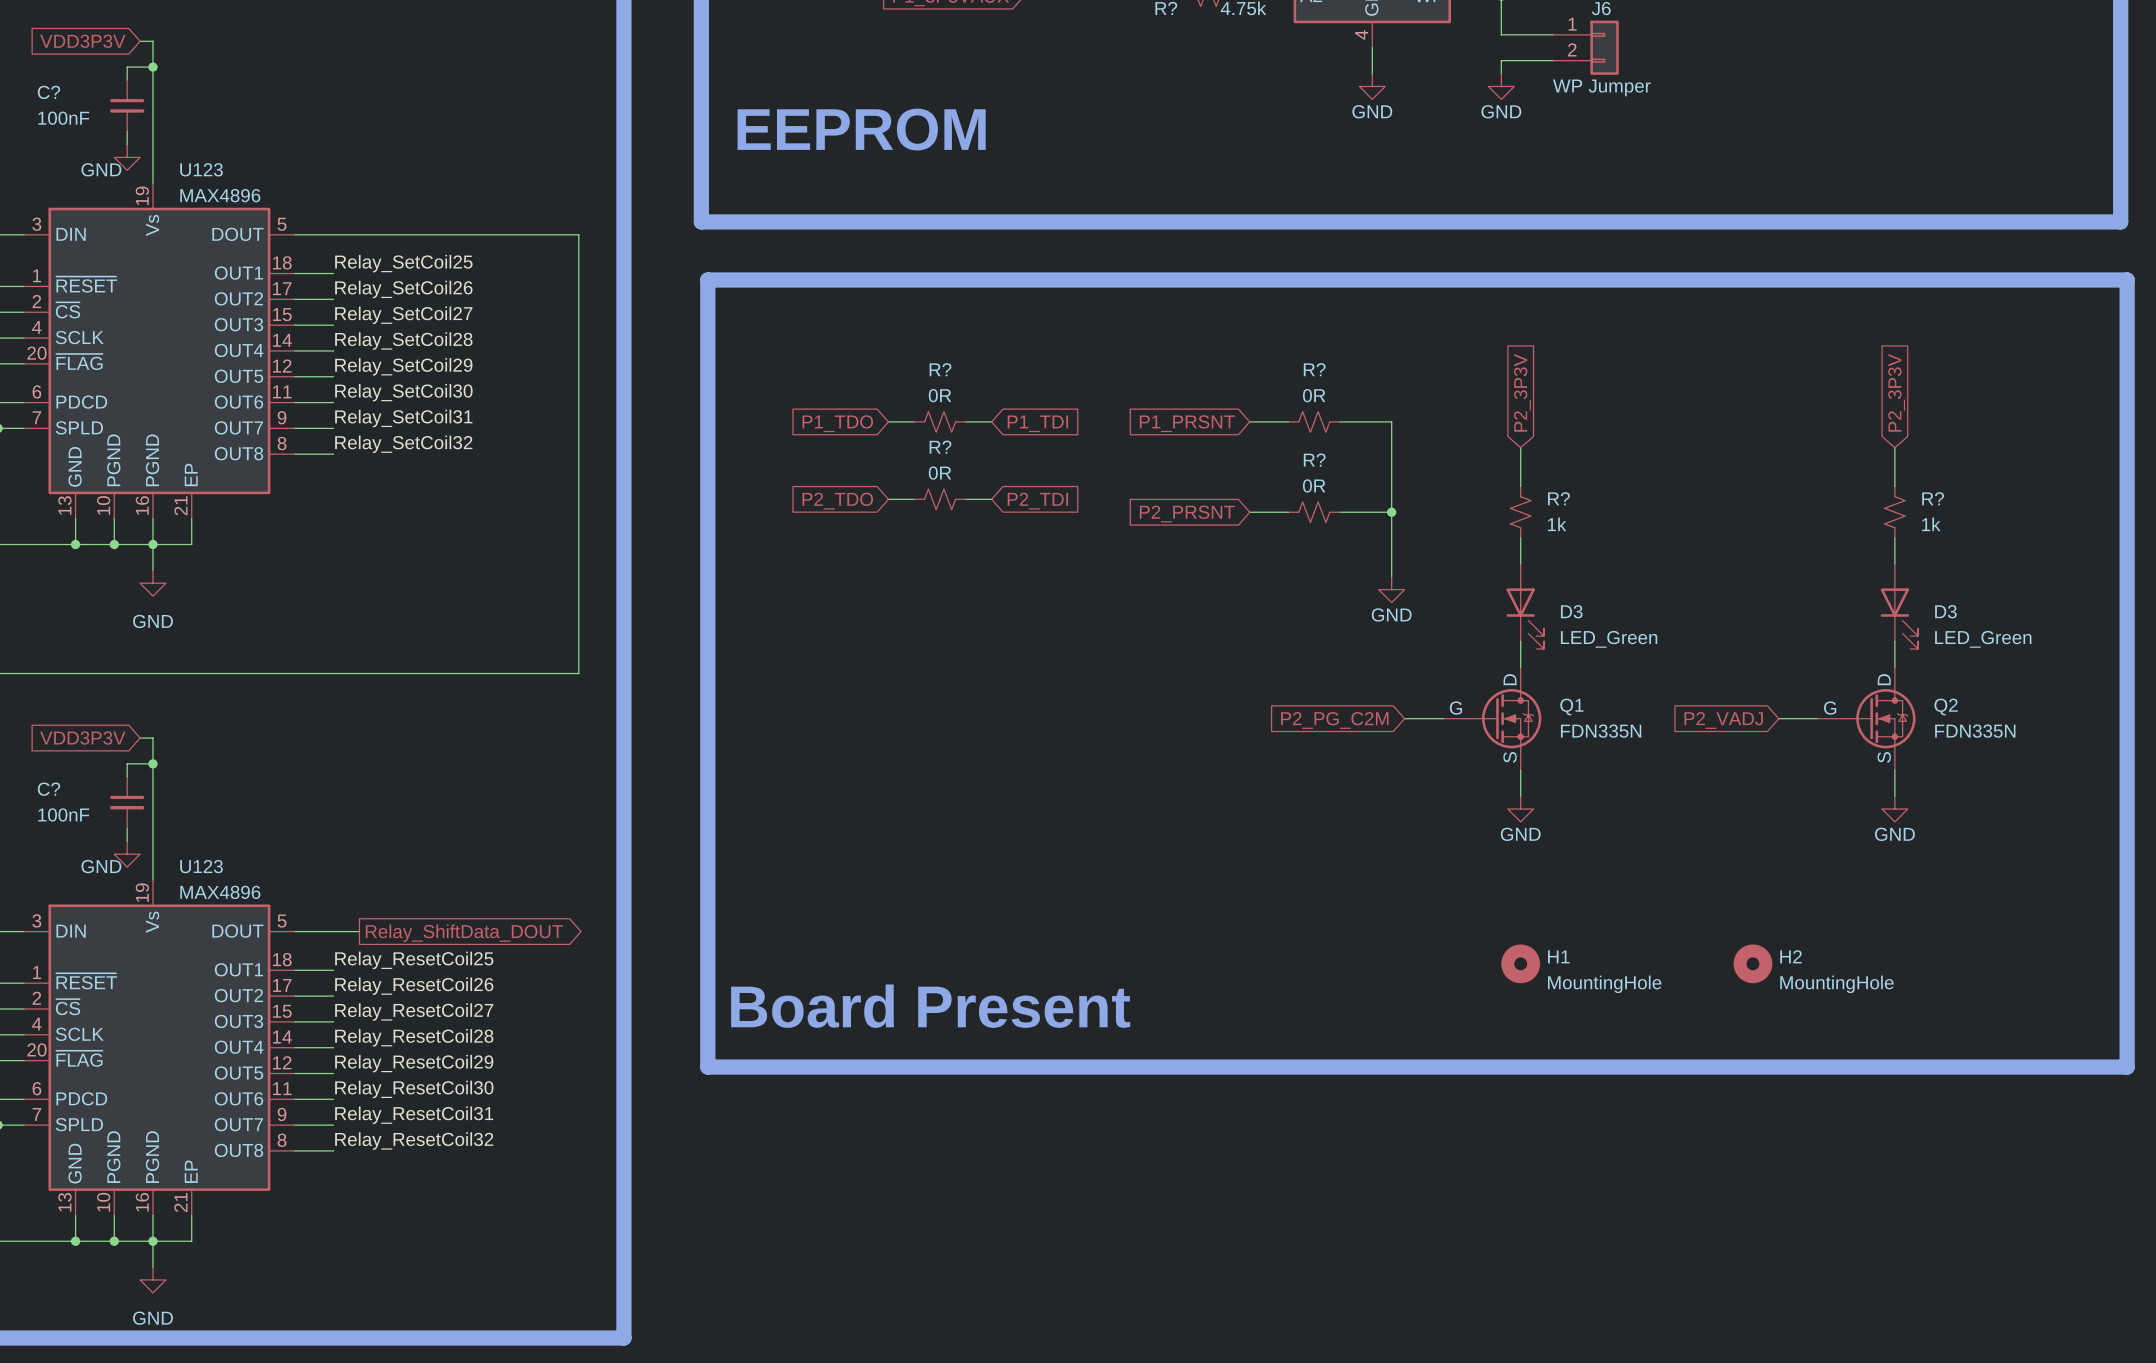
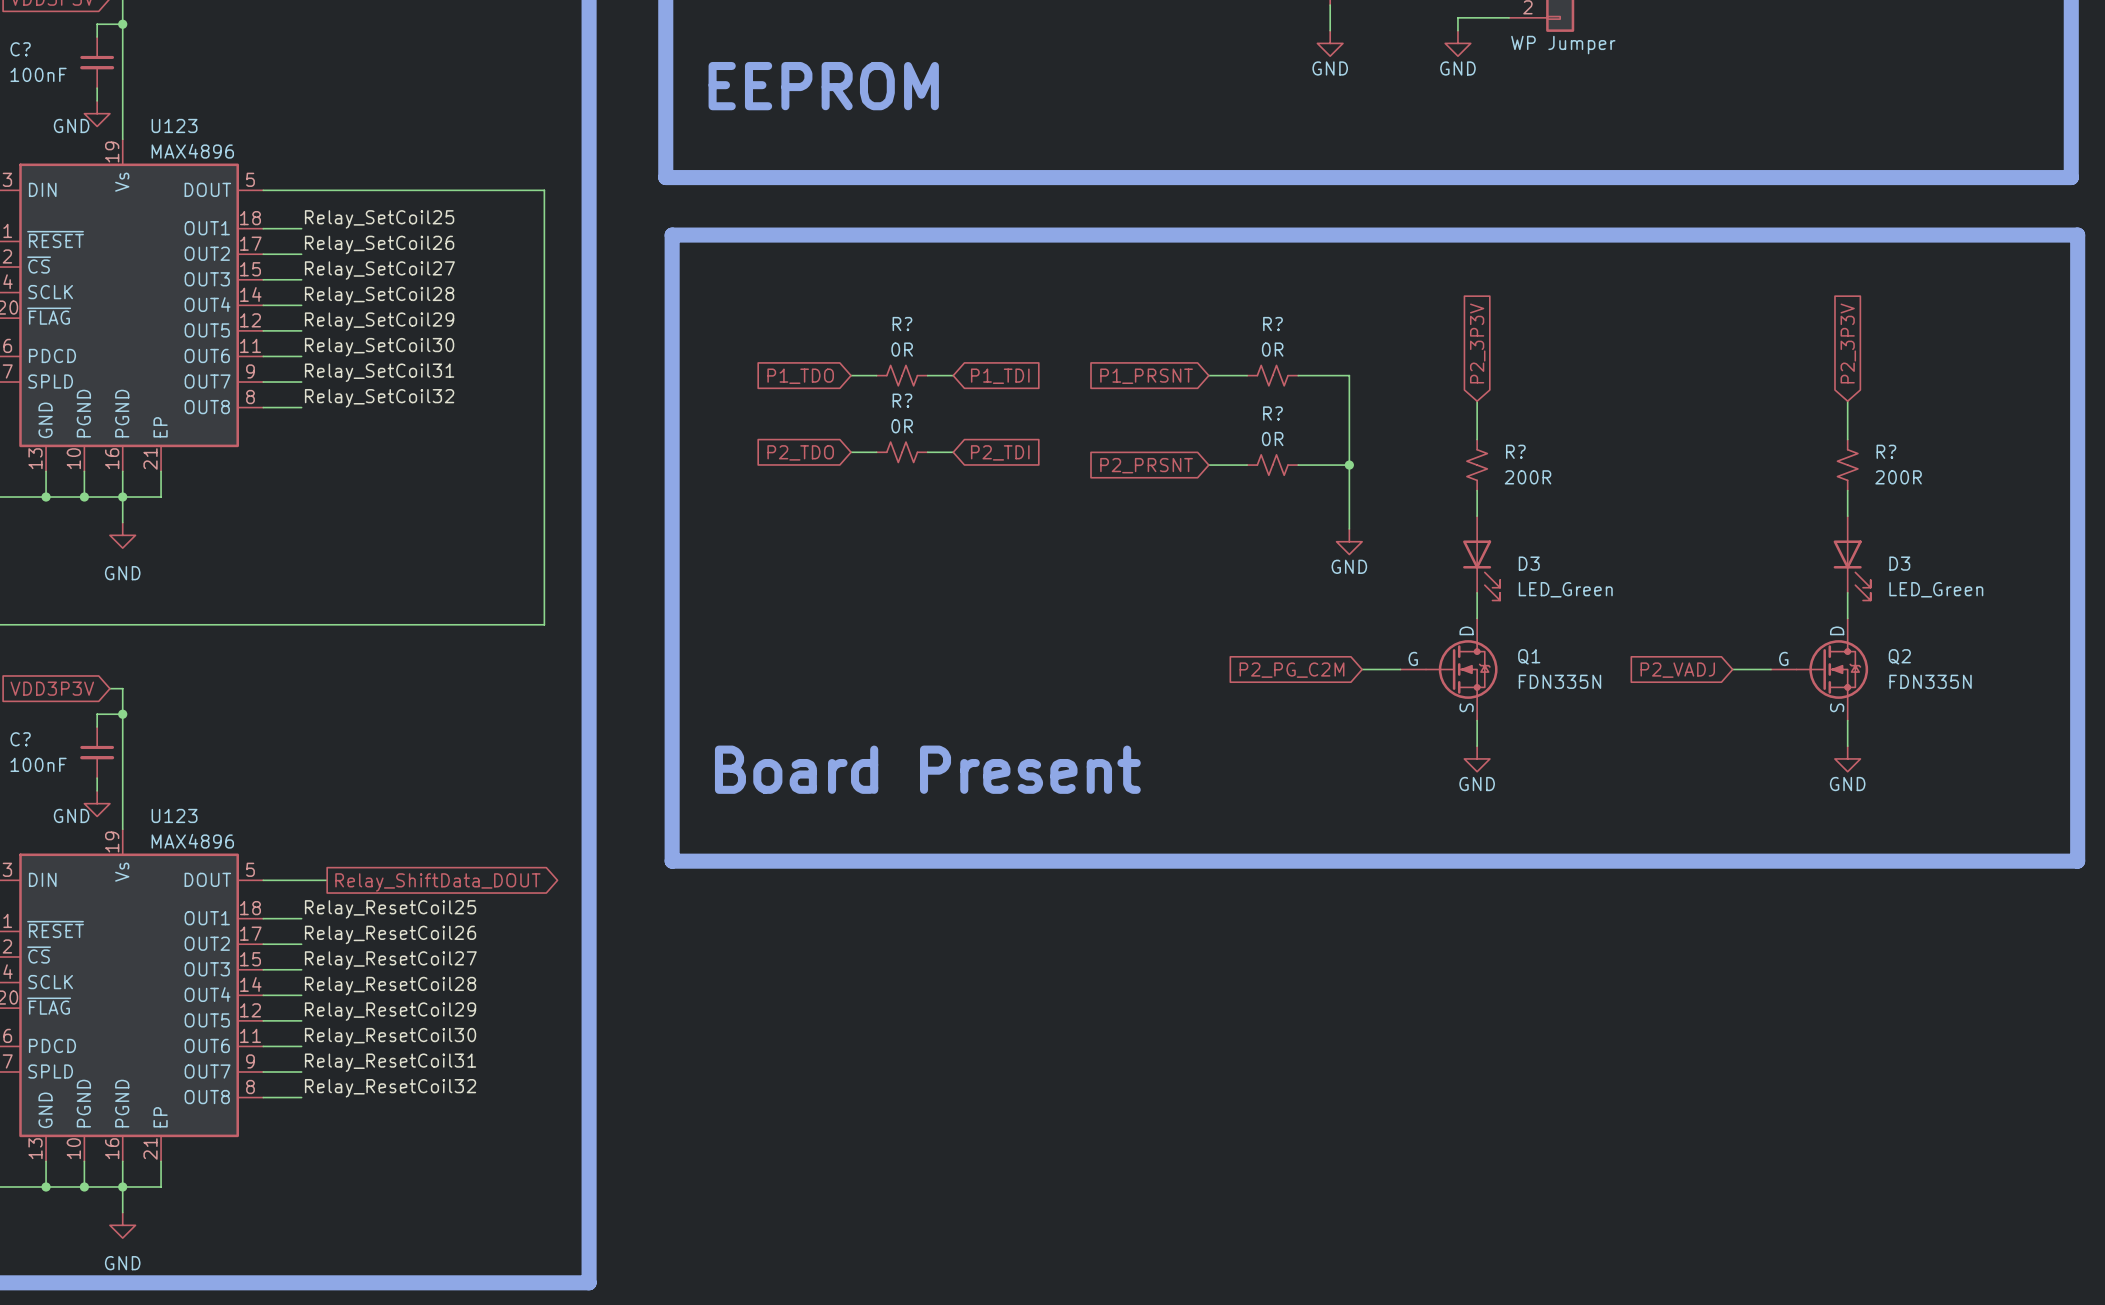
R? value: 1k (1557, 524) -> 200R (1528, 477)
R? value: 1k (1931, 524) -> 200R (1898, 477)
line: (707, 912) (707, 1067) (2127, 1067) (2127, 912) -> (672, 861) (2077, 861)
H1: MountingHole (1520, 963) -> none
H2: MountingHole (1752, 963) -> none
text position: Board Present (930, 1006) -> Board Present (927, 769)

